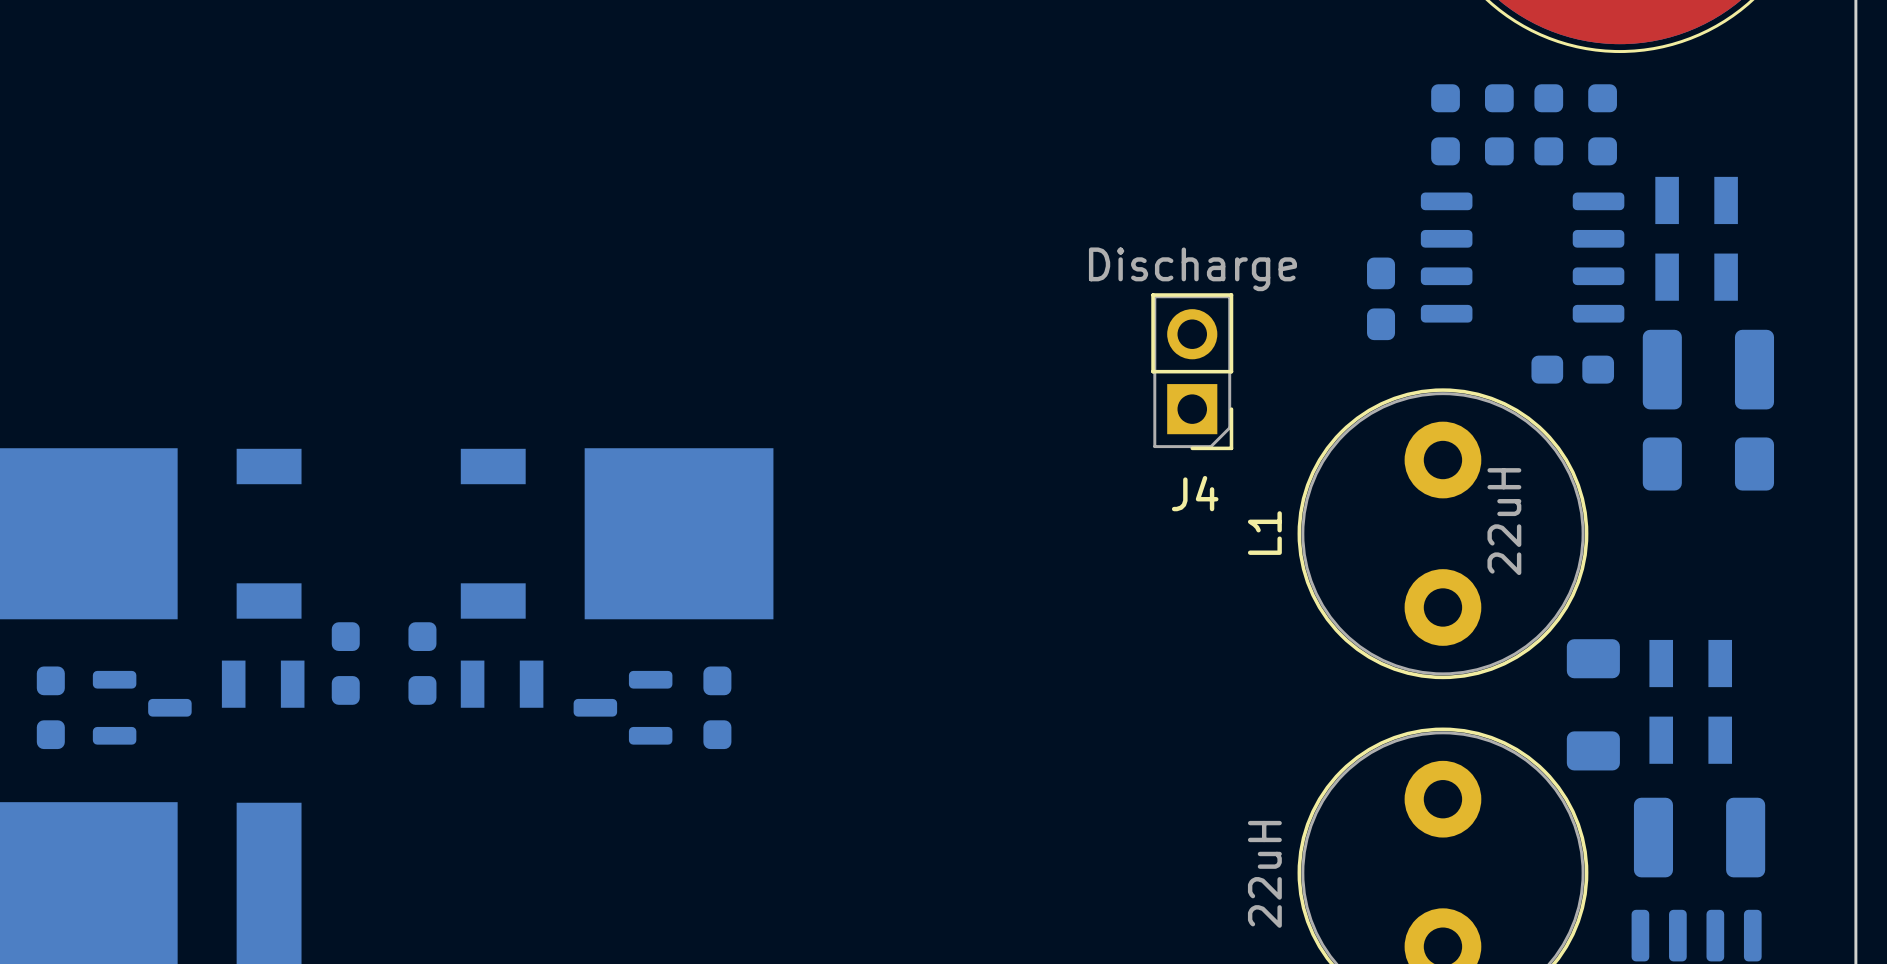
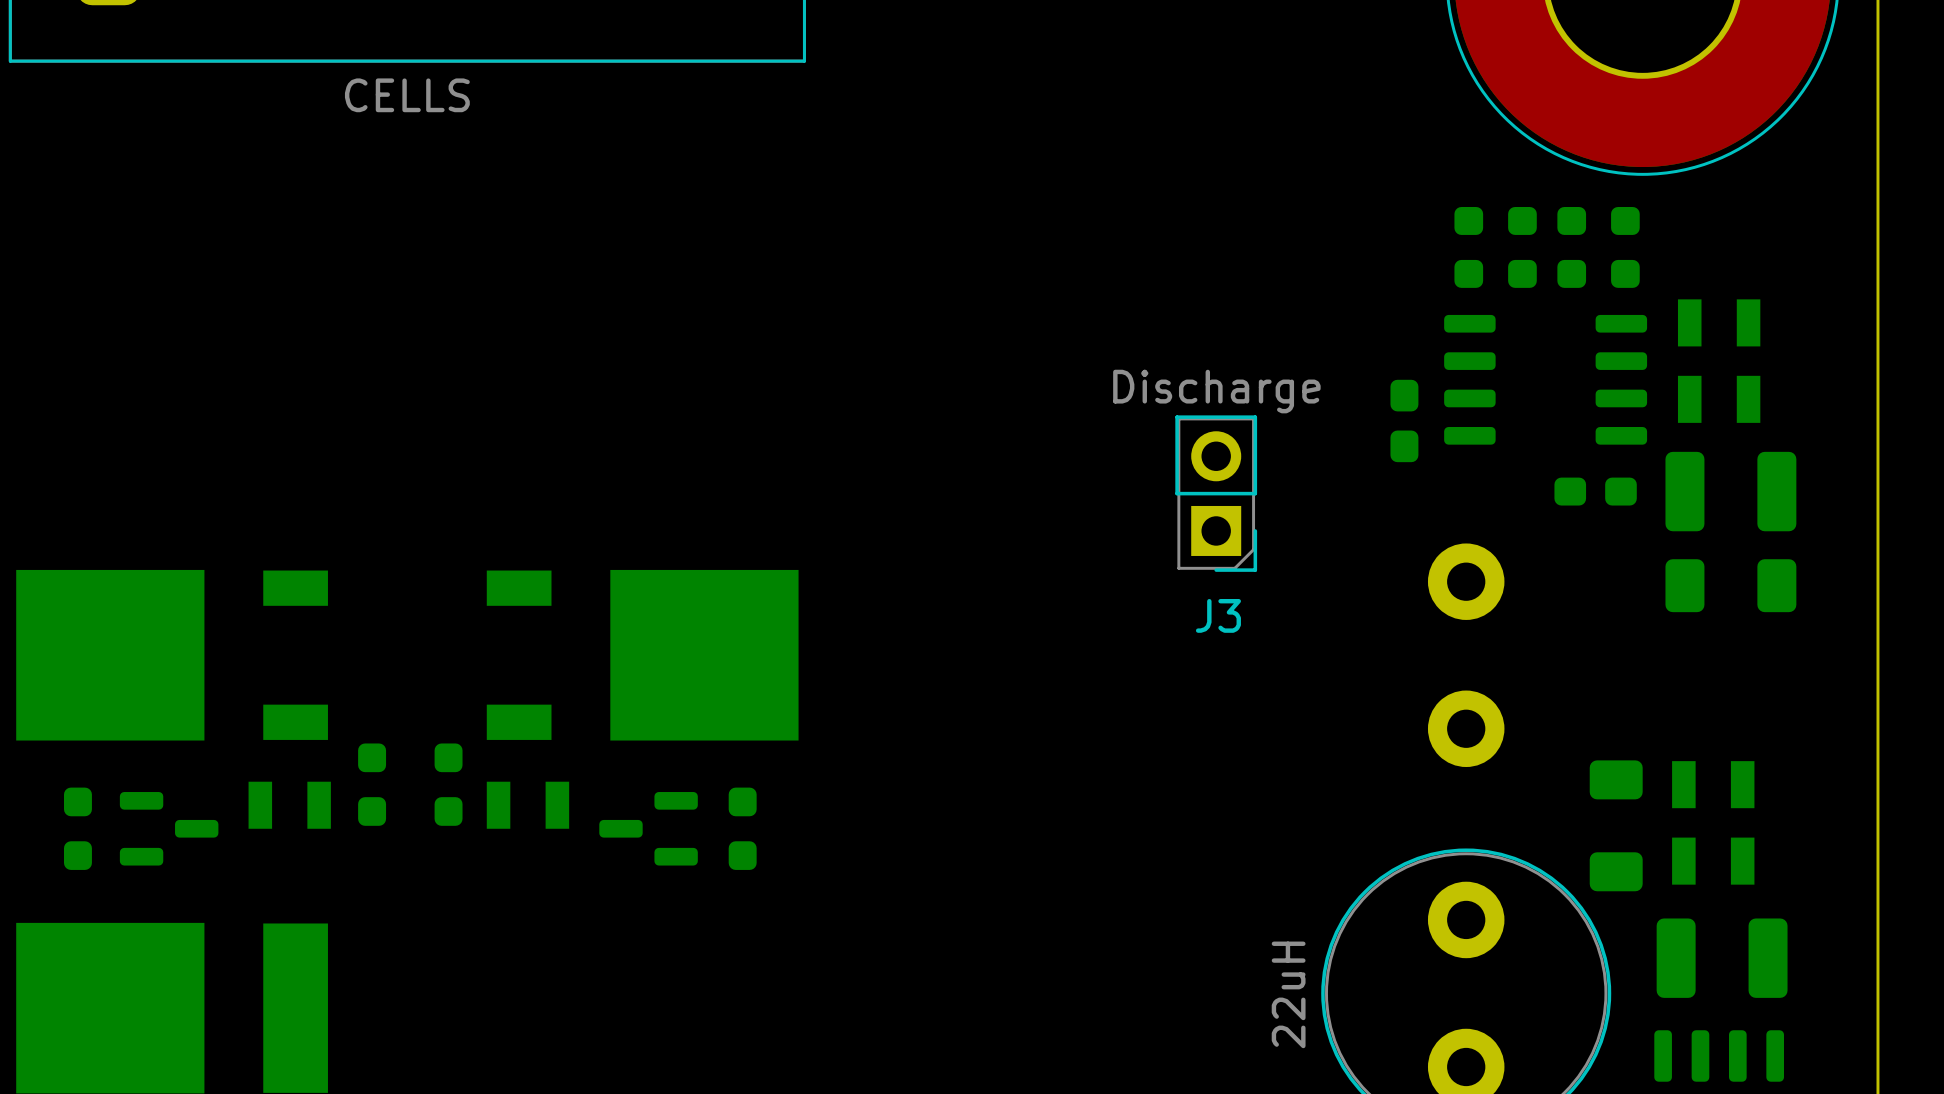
J4 name: J4 (1195, 493) -> J3 (1218, 615)
L1 side: top (1442, 533) -> bottom (1466, 655)

